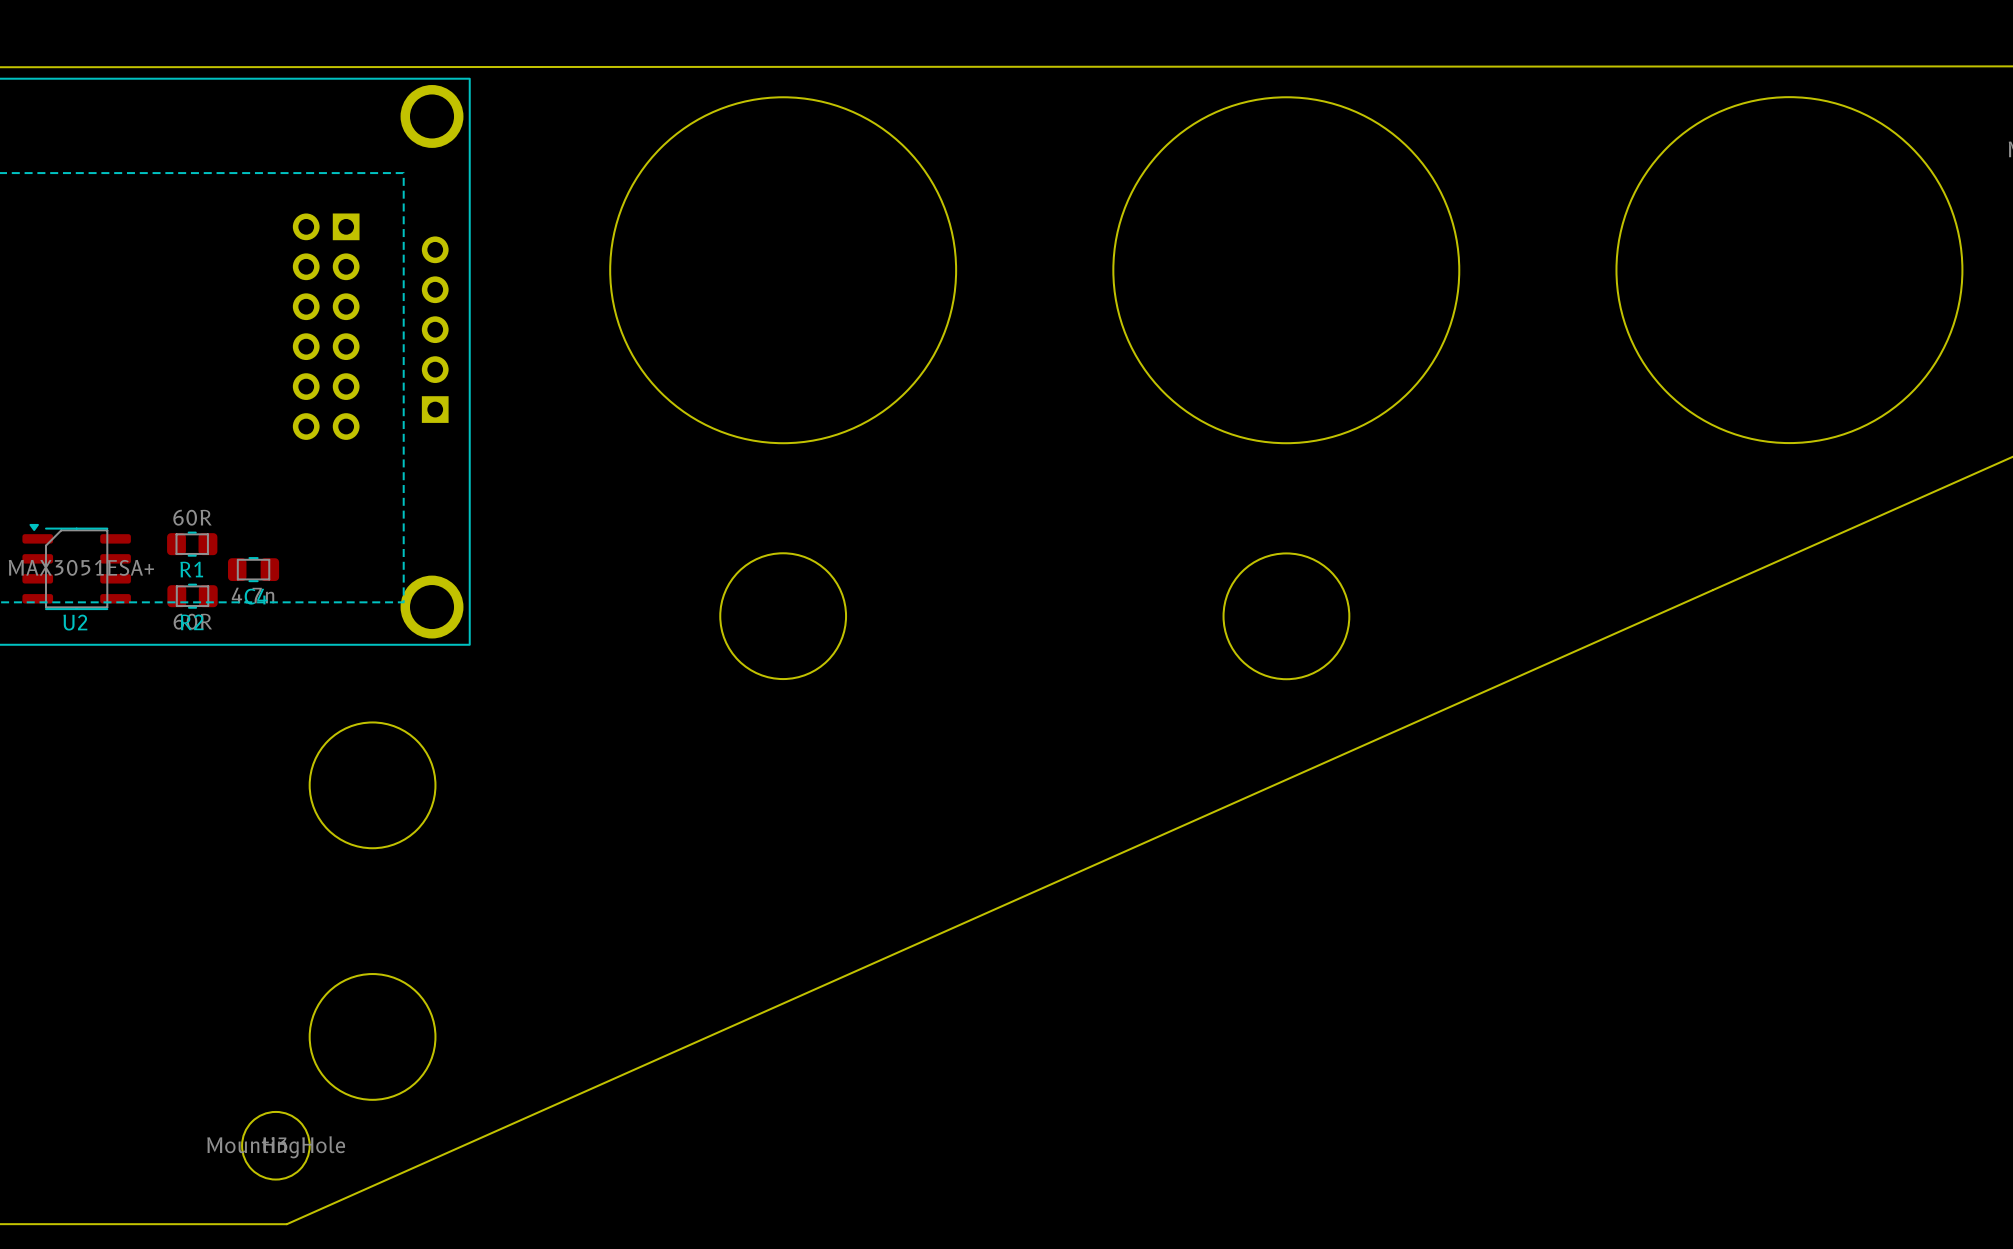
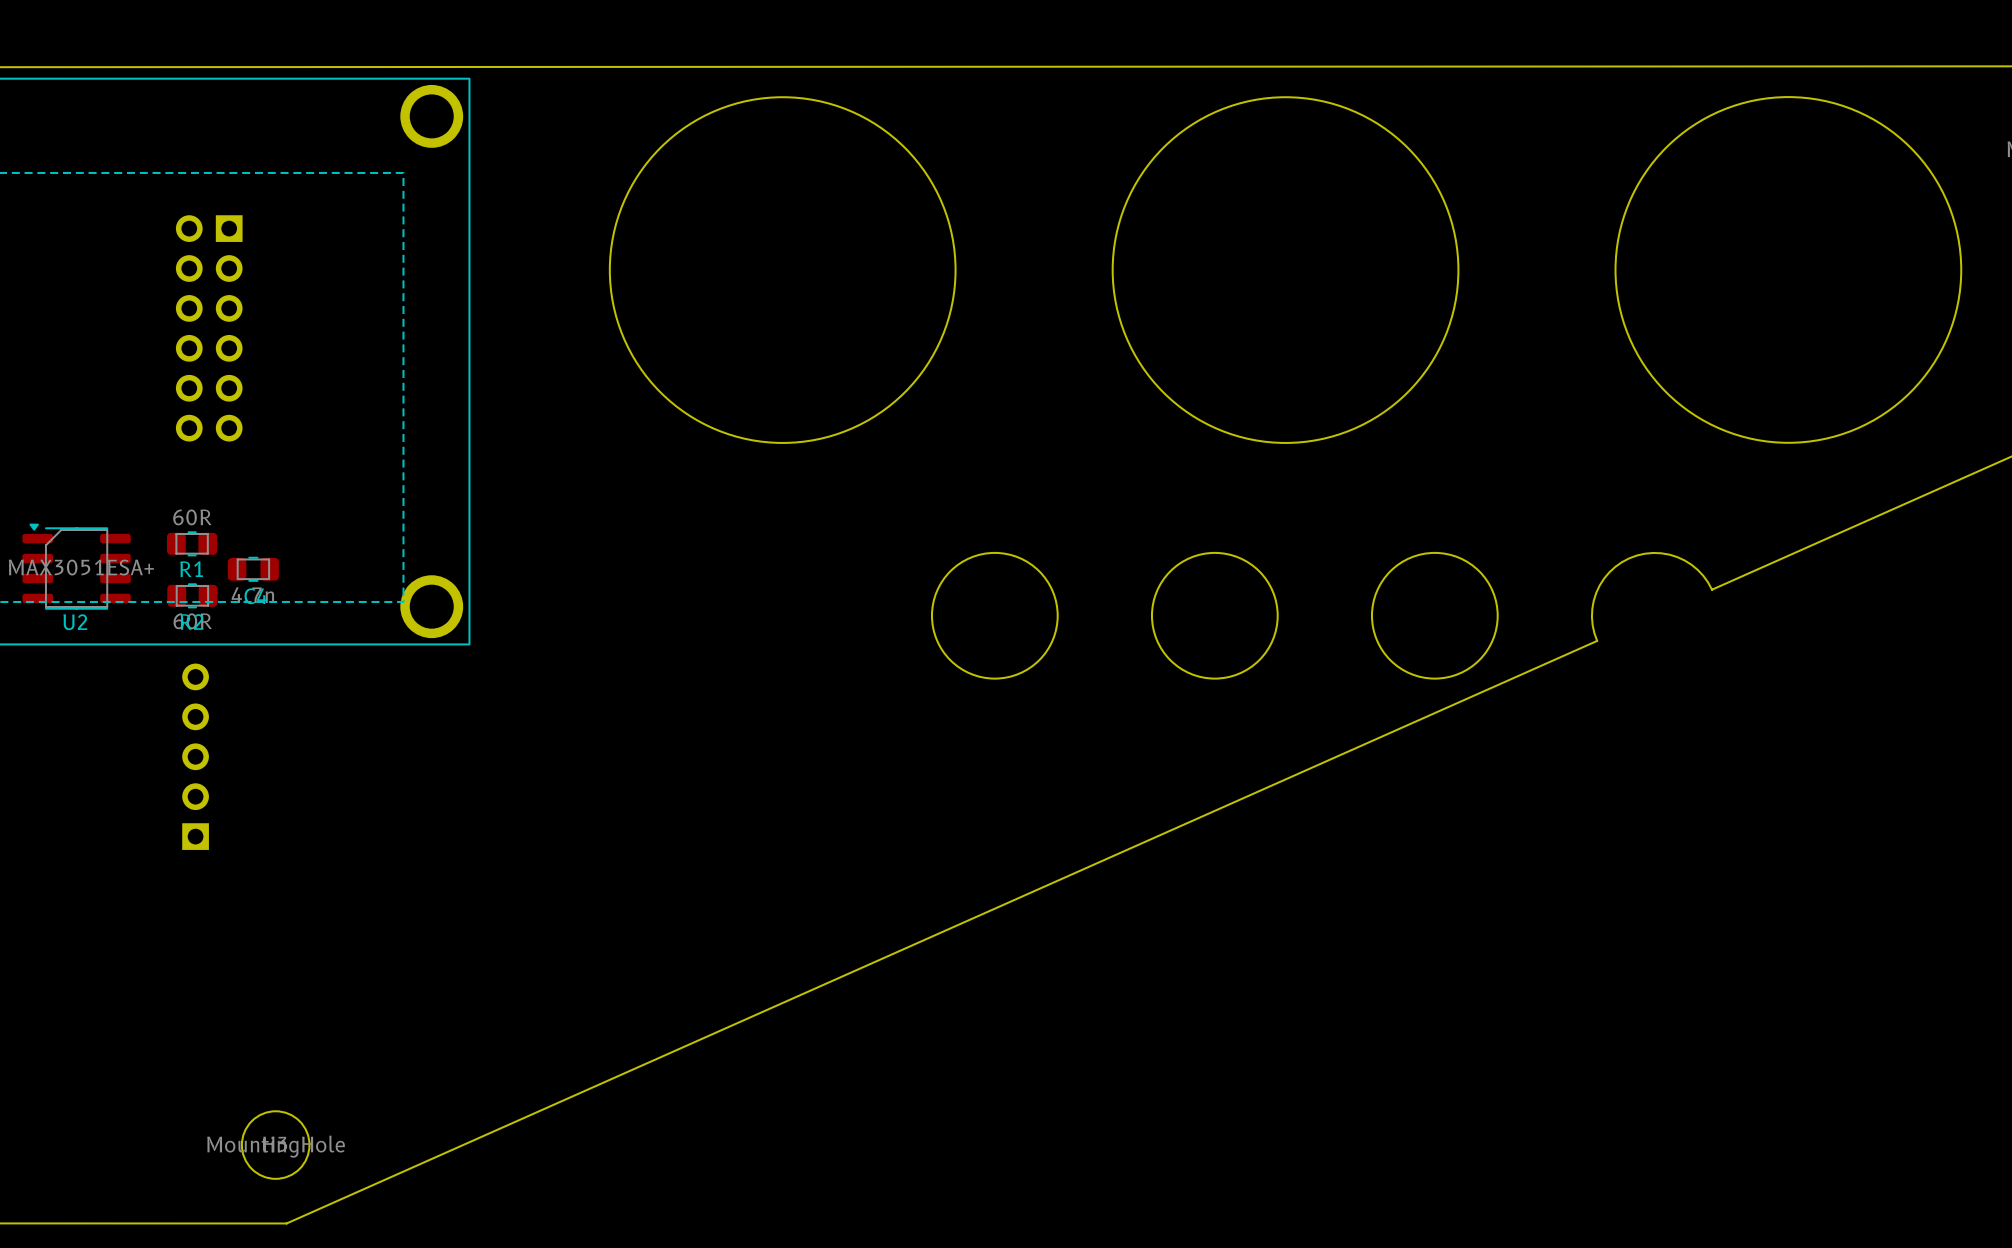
part position: (326, 326) -> (209, 328)
part: (435, 329) -> none
round board edge: [719, 552, 847, 680] -> none
round board edge: none -> [931, 552, 1059, 680]
round board edge: none -> [1371, 552, 1499, 680]
board edge: (1713, 590) (286, 1224) -> (1712, 589) (1697, 569) (1677, 556) (1652, 552) (1629, 558) (1609, 572) (1596, 593) (1591, 617) (1597, 640) (286, 1223)
round board edge position: (1286, 616) -> (1214, 615)
round board edge: [308, 721, 437, 850] -> none
part: none -> (195, 756)
round board edge: [308, 973, 437, 1101] -> none

